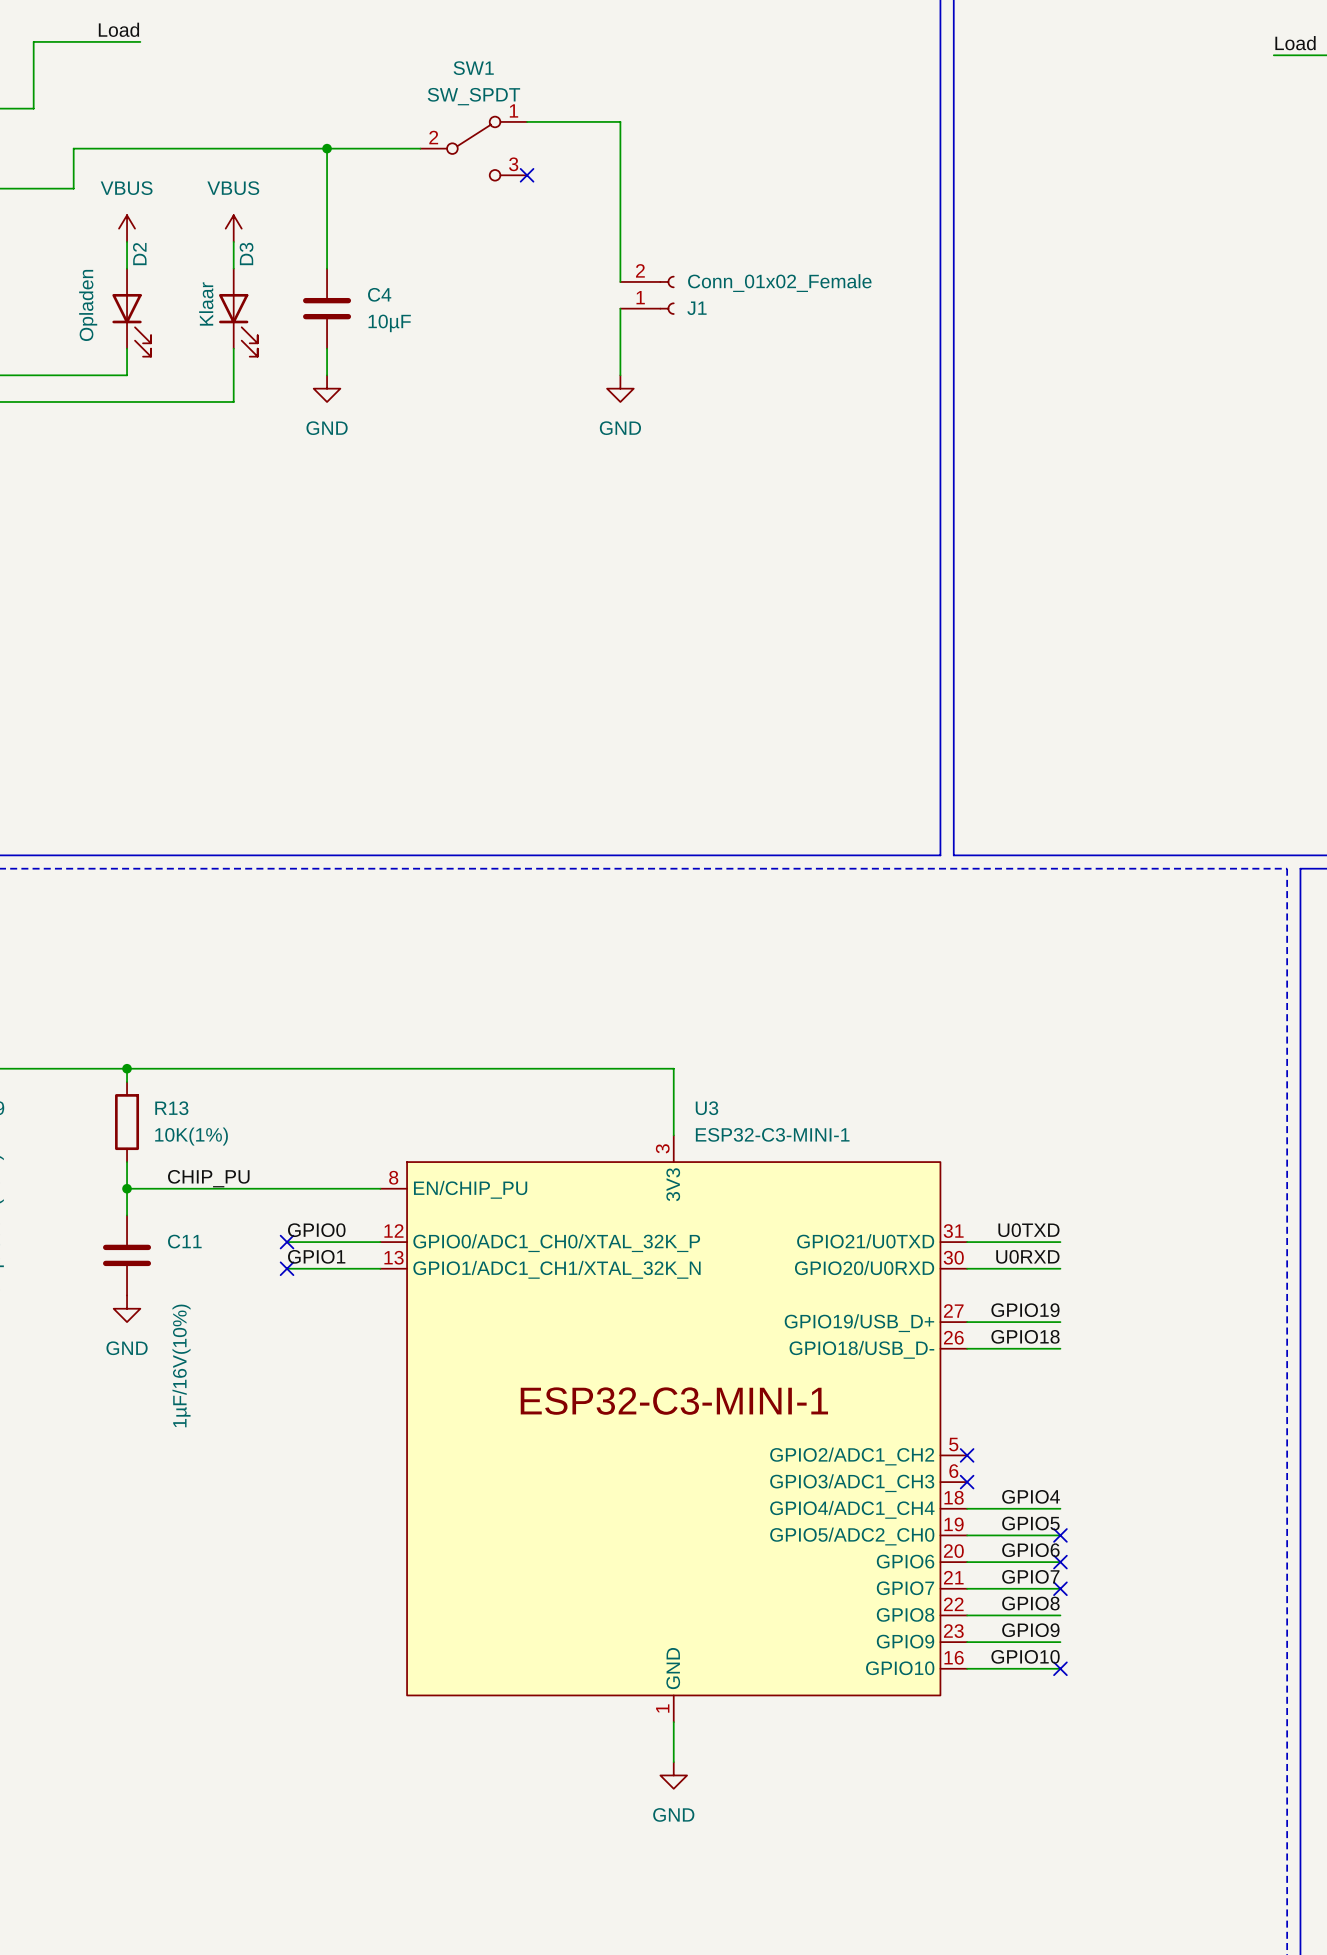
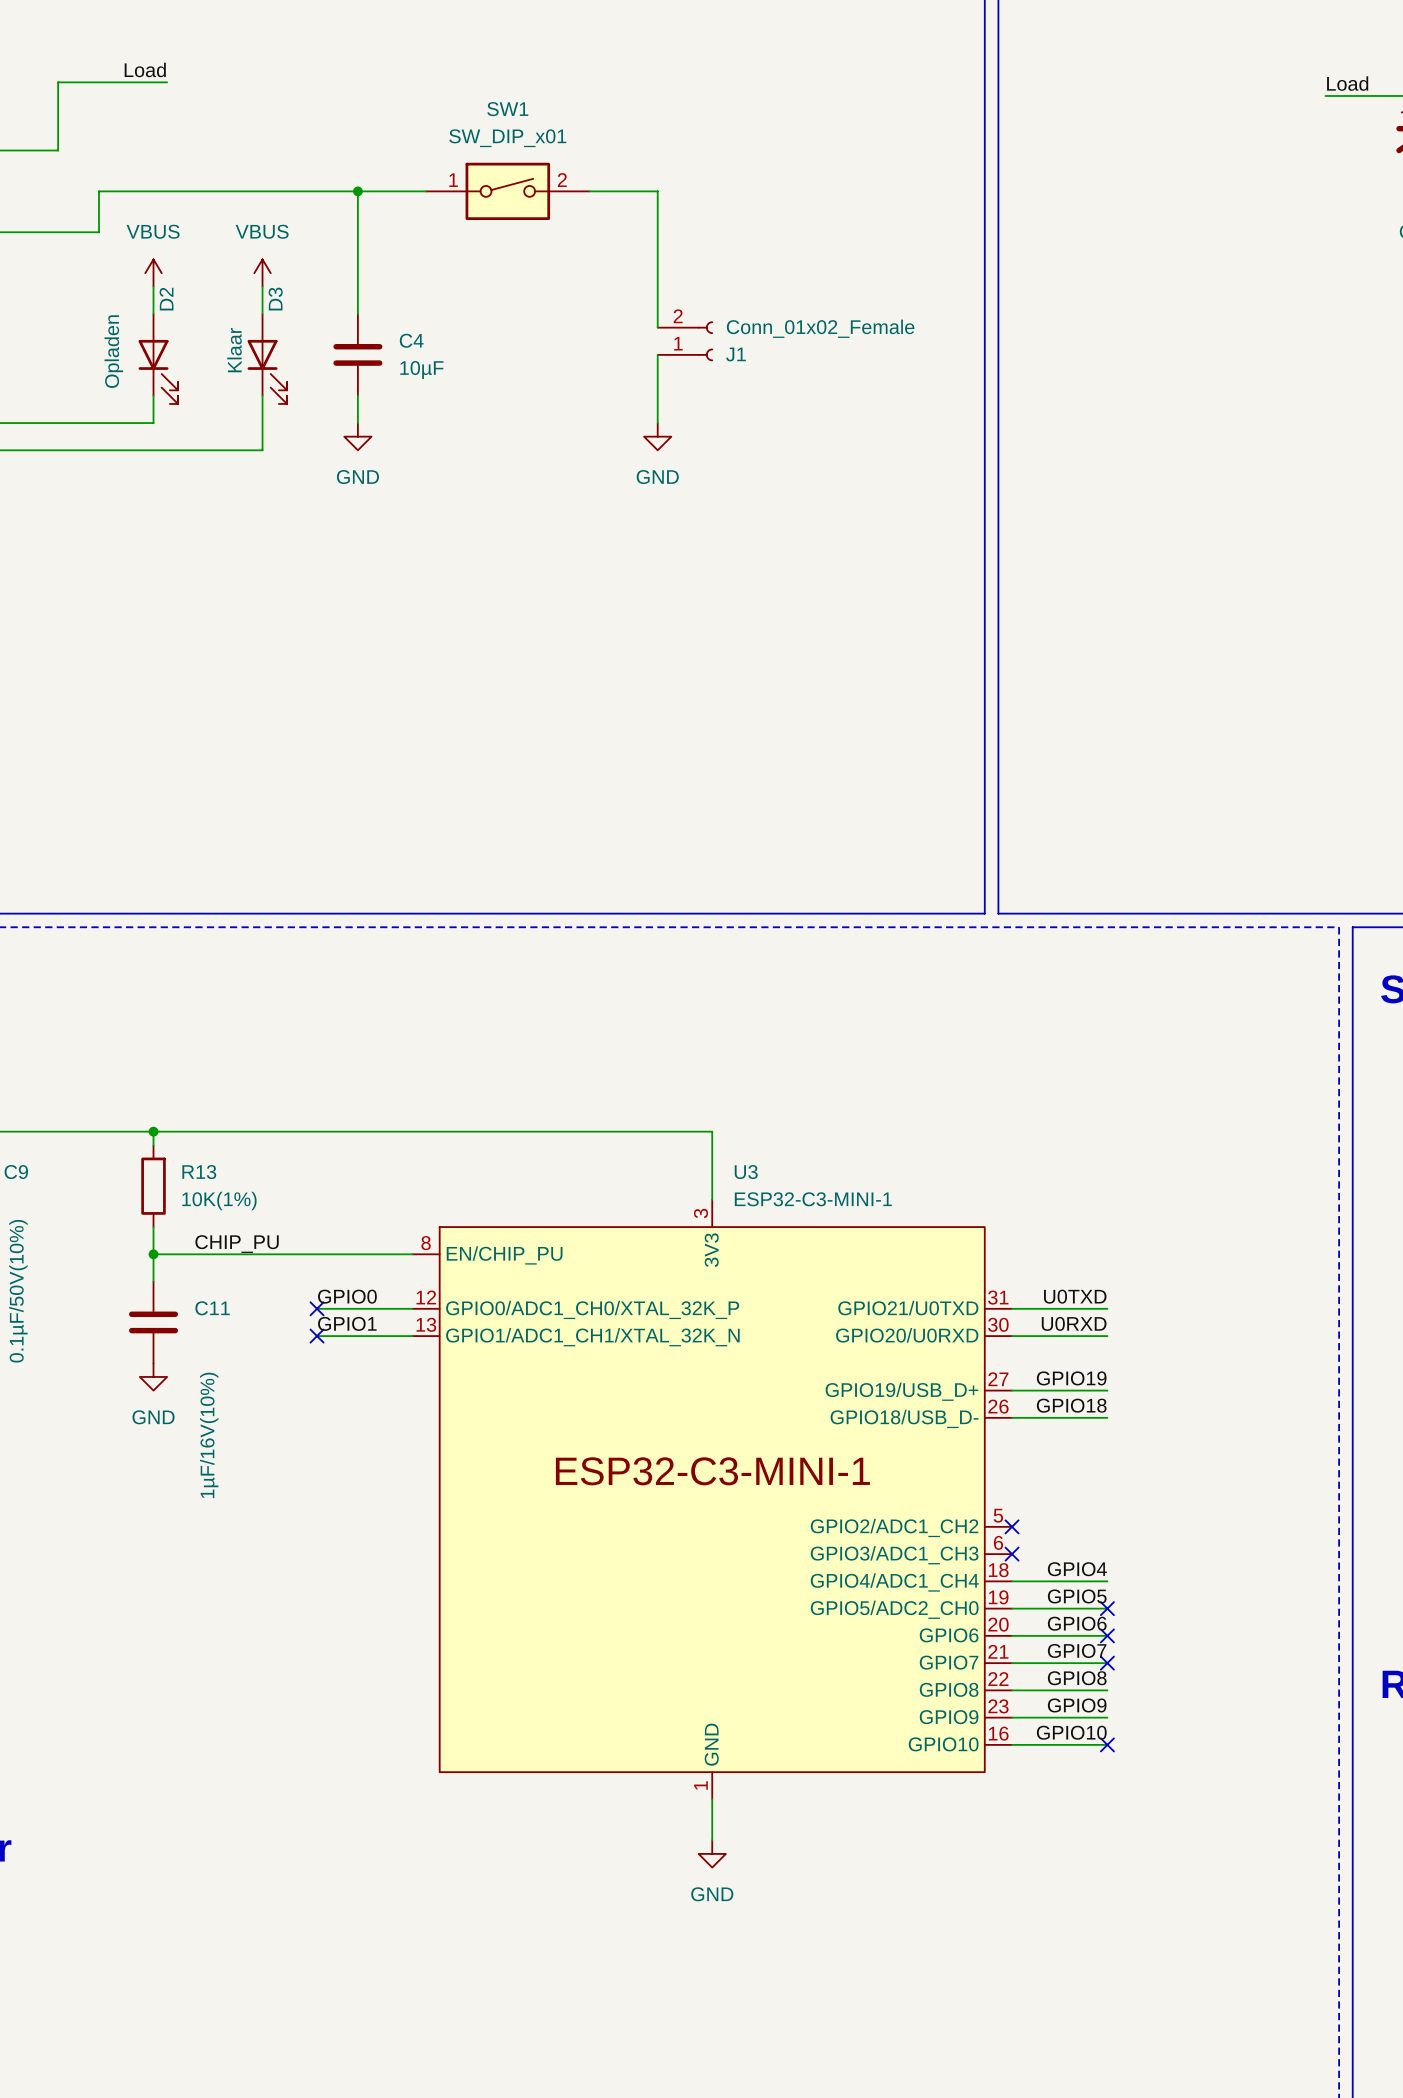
SW1 value: SW_SPDT (473, 96) -> SW_DIP_x01 (507, 138)
SW1 symbol: [420, 116, 528, 181] -> [426, 162, 590, 220]
wire: (527, 121) (620, 121) (620, 148) -> (589, 191) (657, 191)
no-connect mark: (527, 175) -> none

